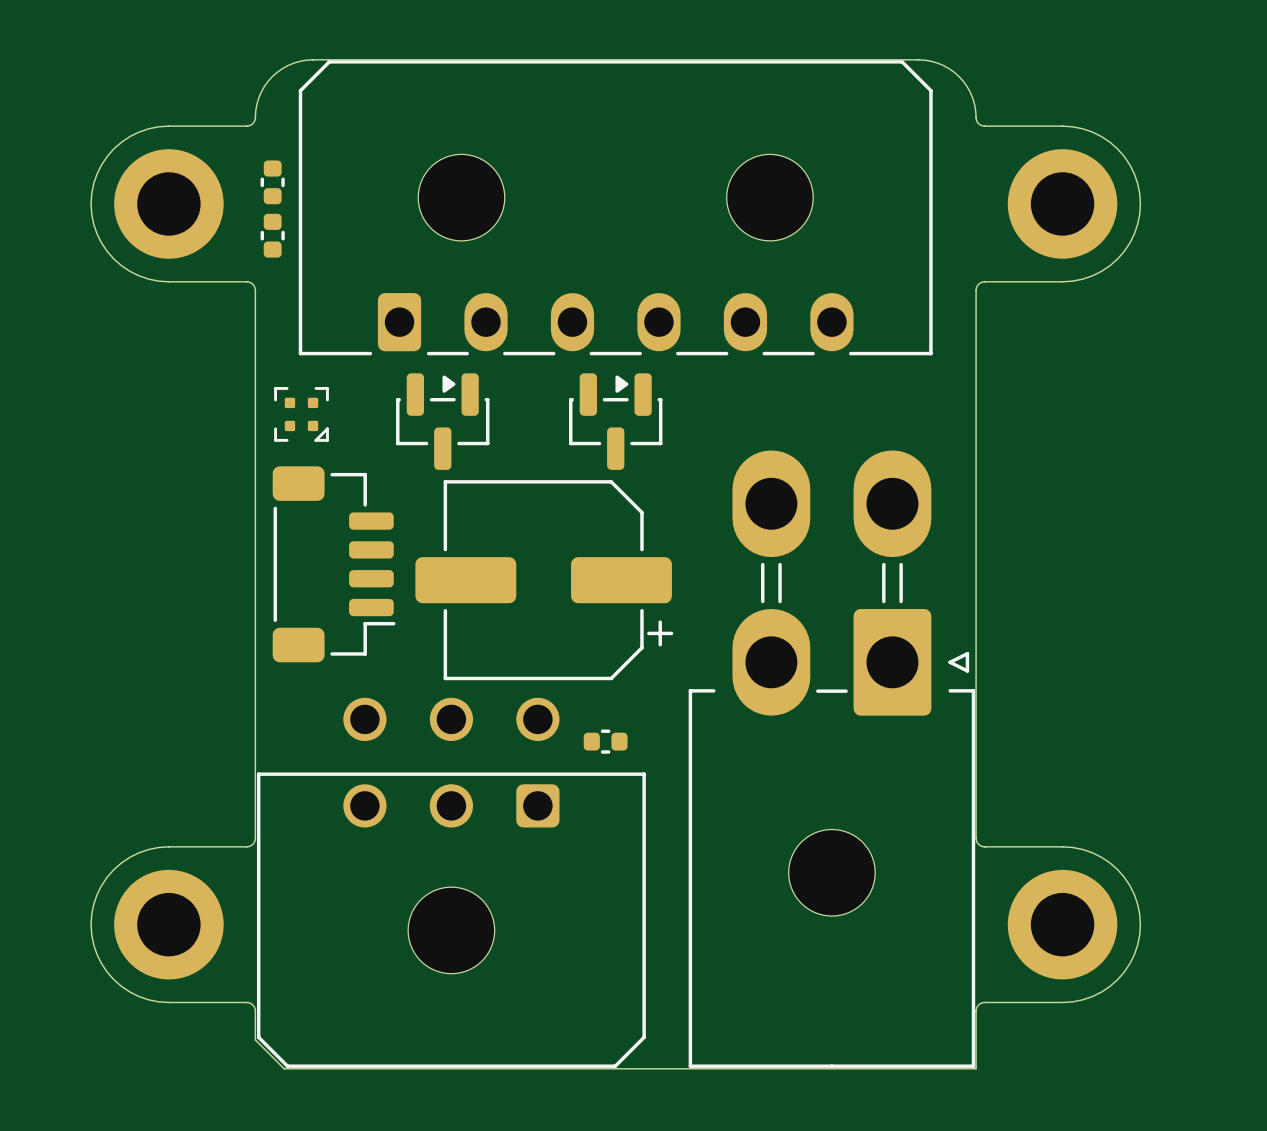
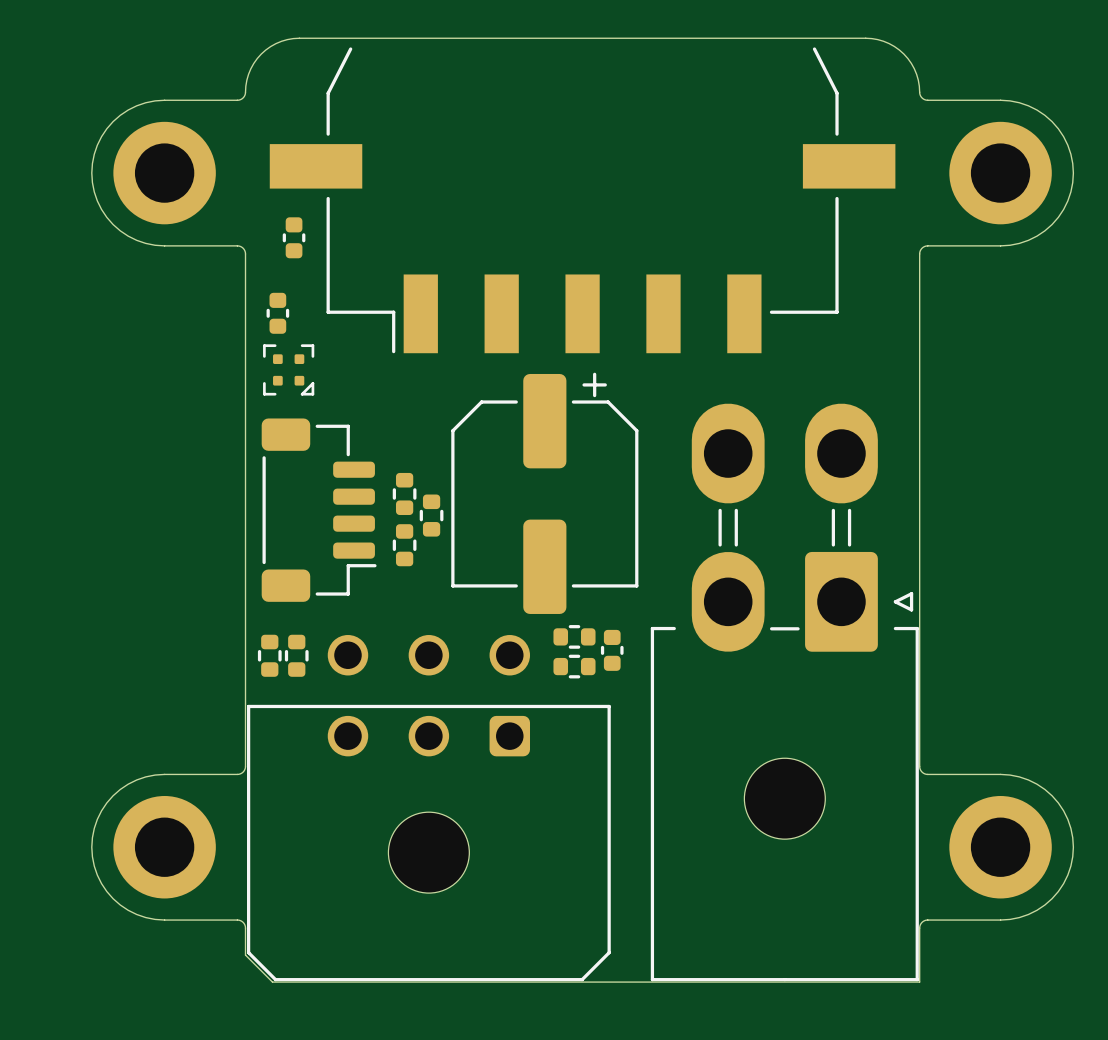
part footprint: [298, 60, 933, 356] -> [269, 47, 896, 354]
part: (272, 182) -> none
part: (272, 235) -> none
part: none -> (294, 237)
part: none -> (277, 313)
part: (442, 421) -> none
part: (615, 421) -> none
part: none -> (544, 493)
part: none -> (404, 493)
part: none -> (431, 515)
part: (544, 580) -> none
part: none -> (404, 545)
part: none -> (574, 636)
part: none -> (612, 650)
part: none -> (269, 655)
part: none -> (296, 655)
part footprint: [583, 729, 628, 754] -> [553, 654, 596, 679]

